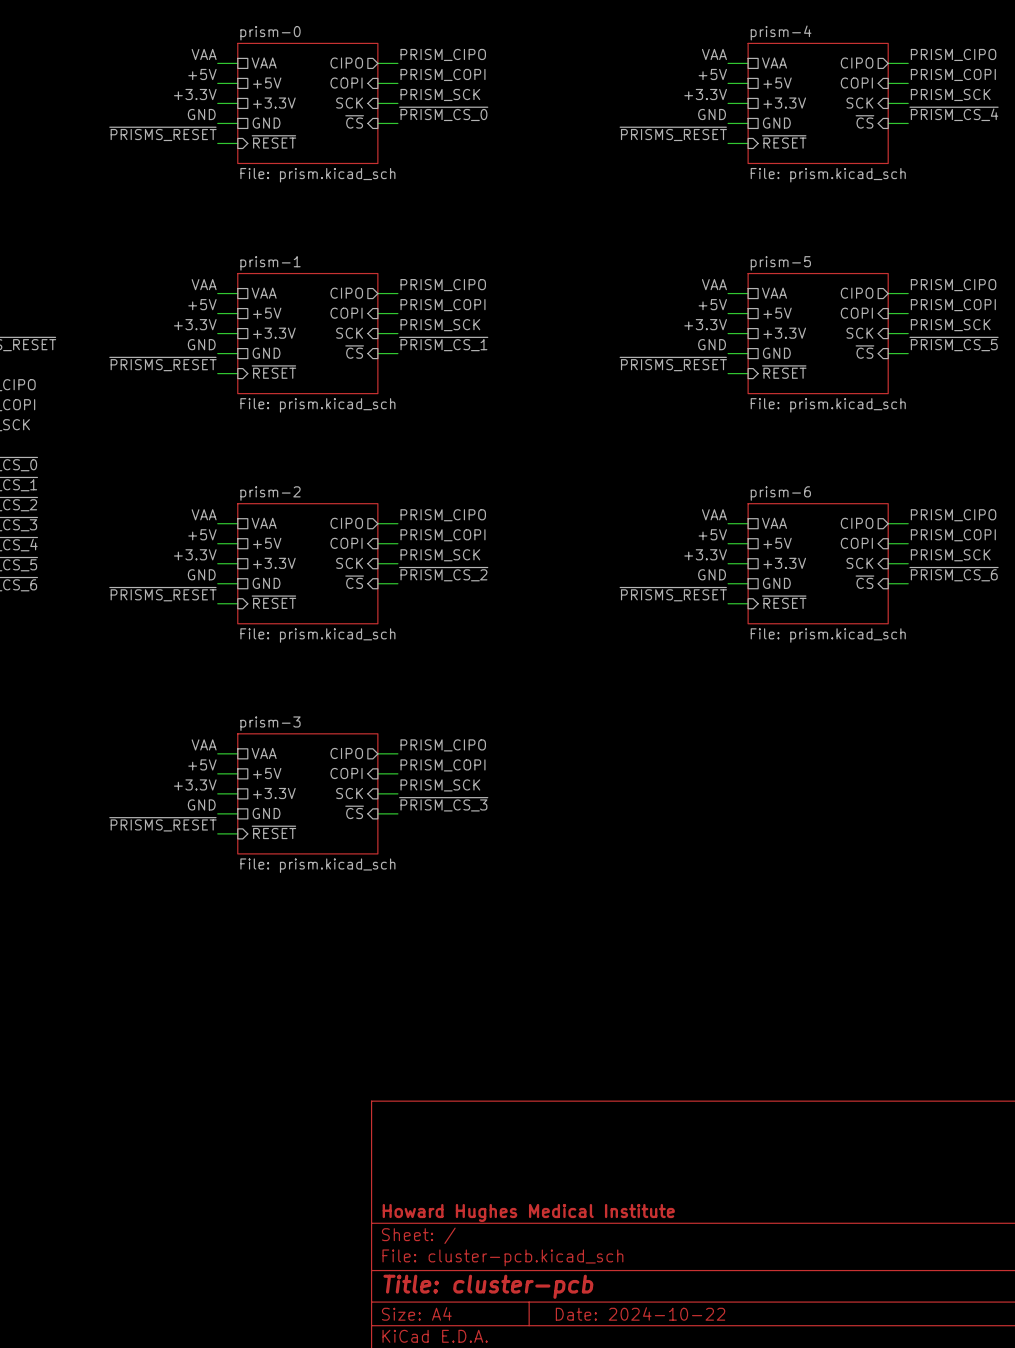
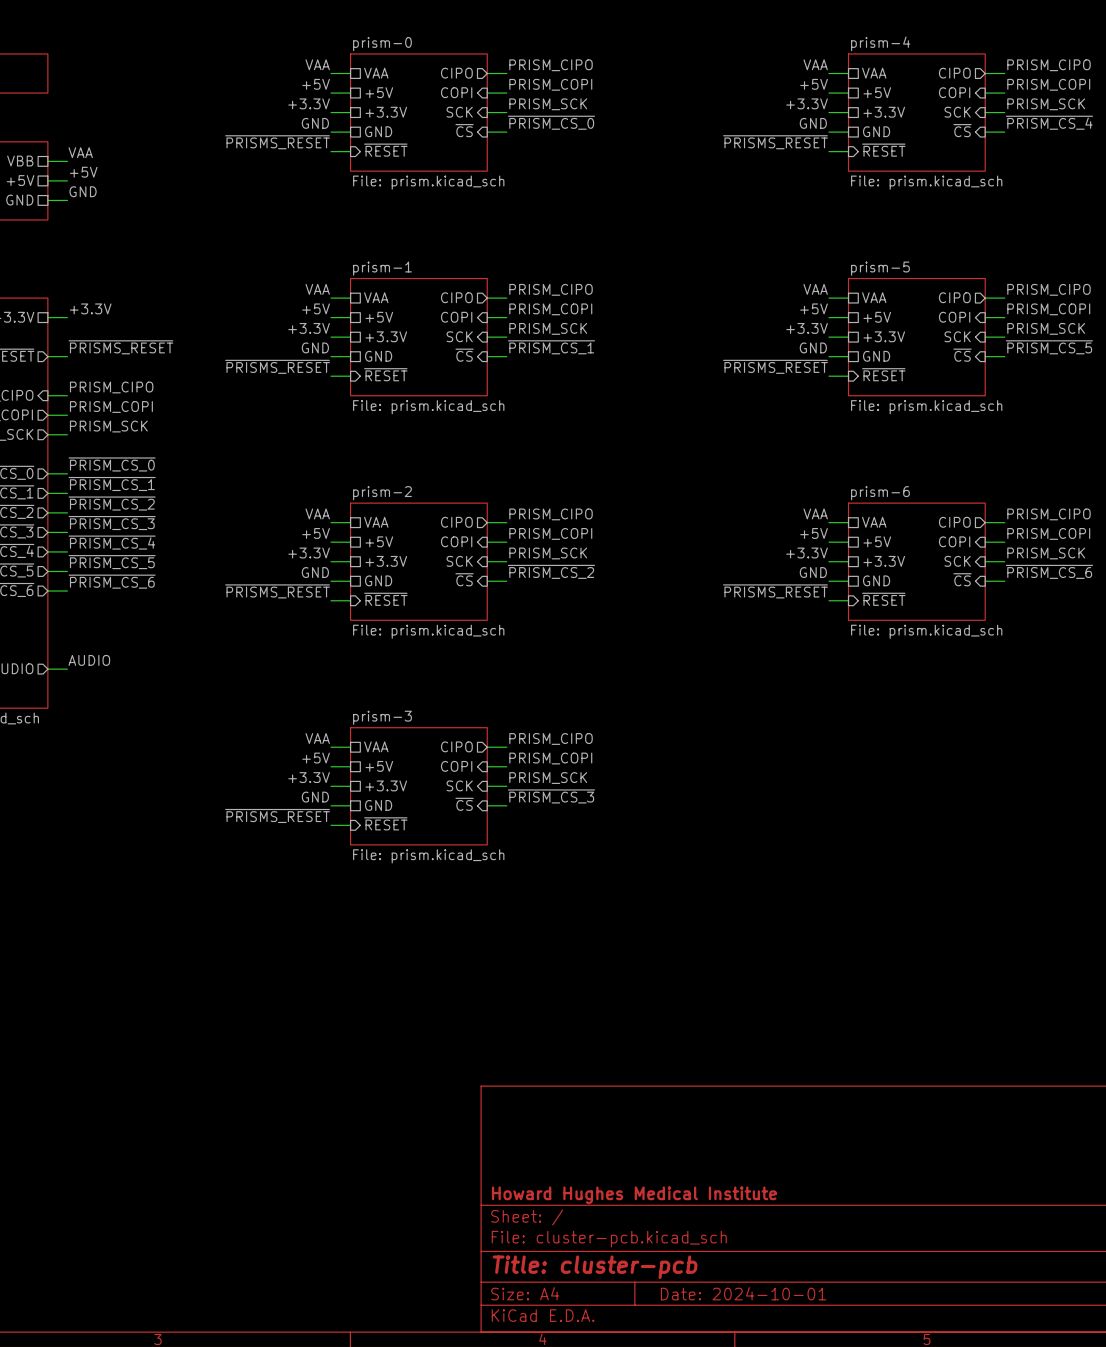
title block: Date: 2024-10-22 (640, 1313) -> Date: 2024-10-01 (743, 1293)

